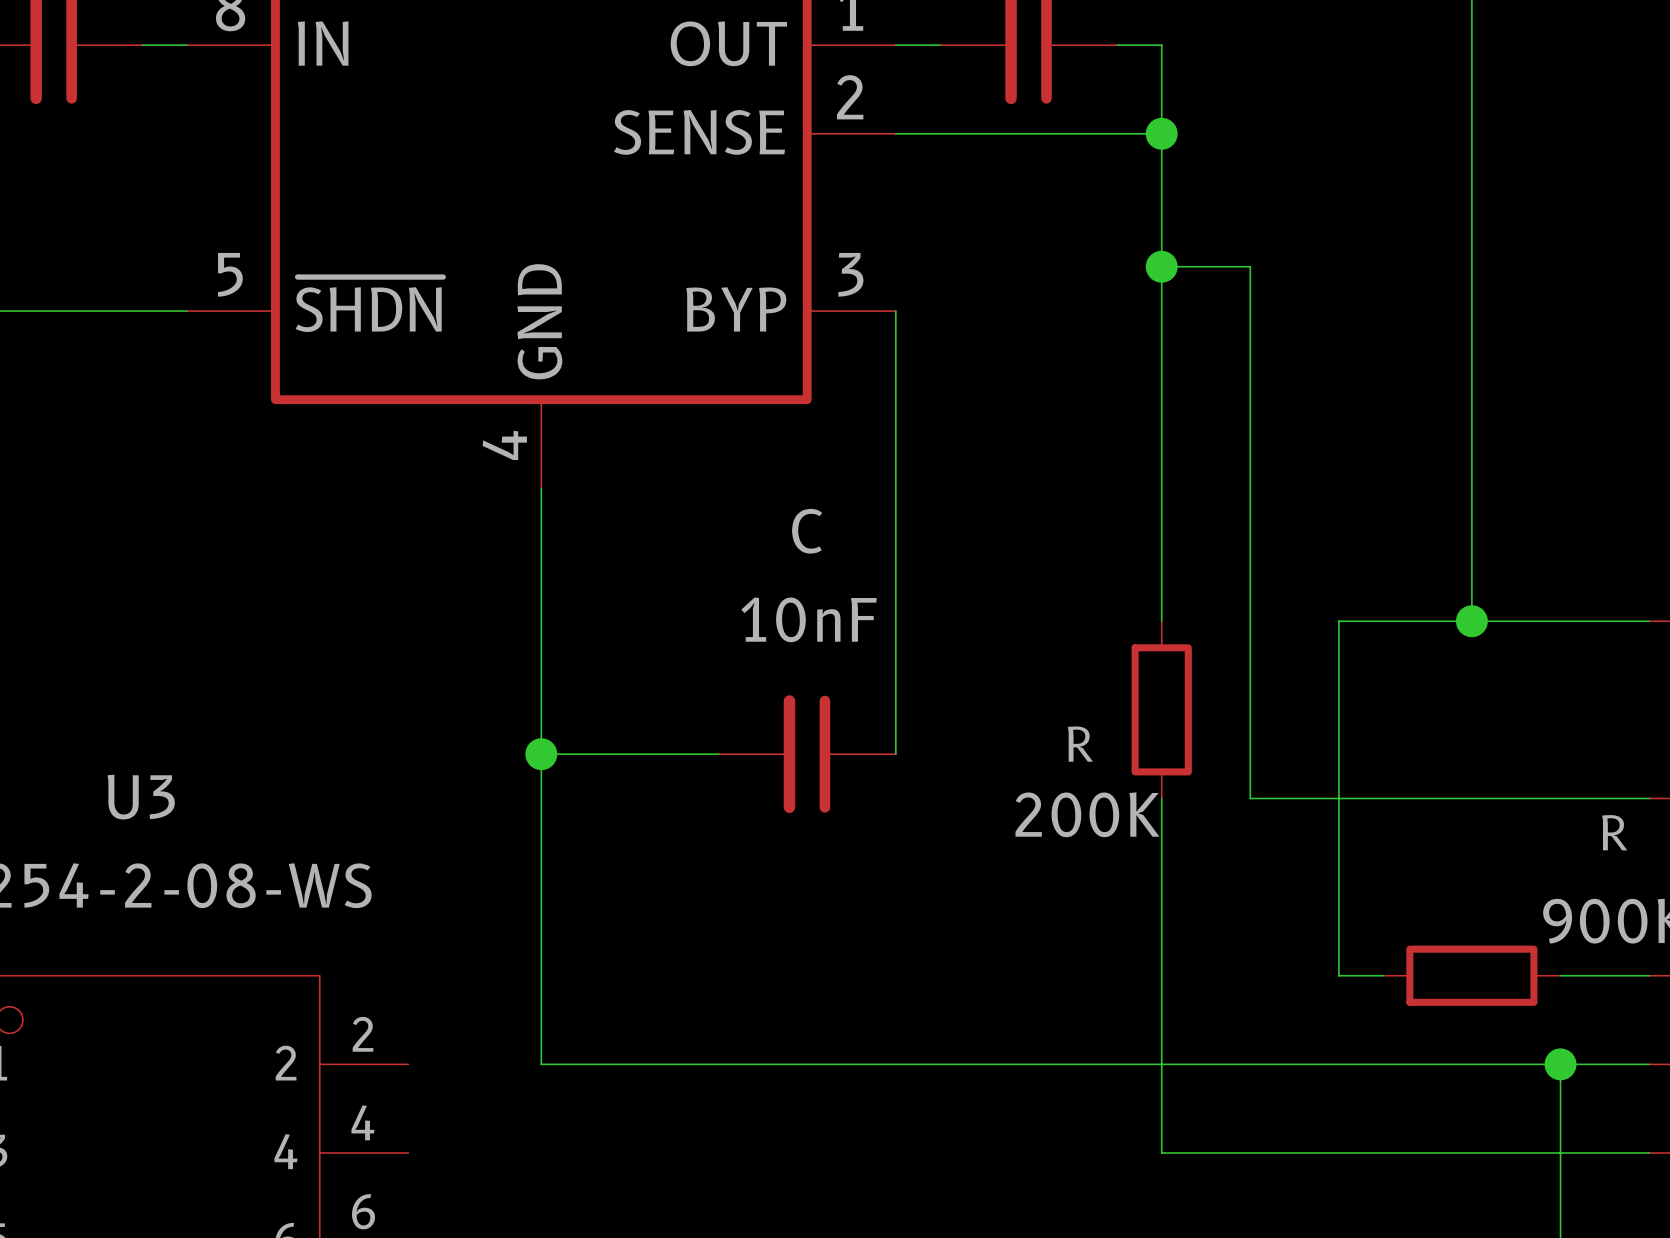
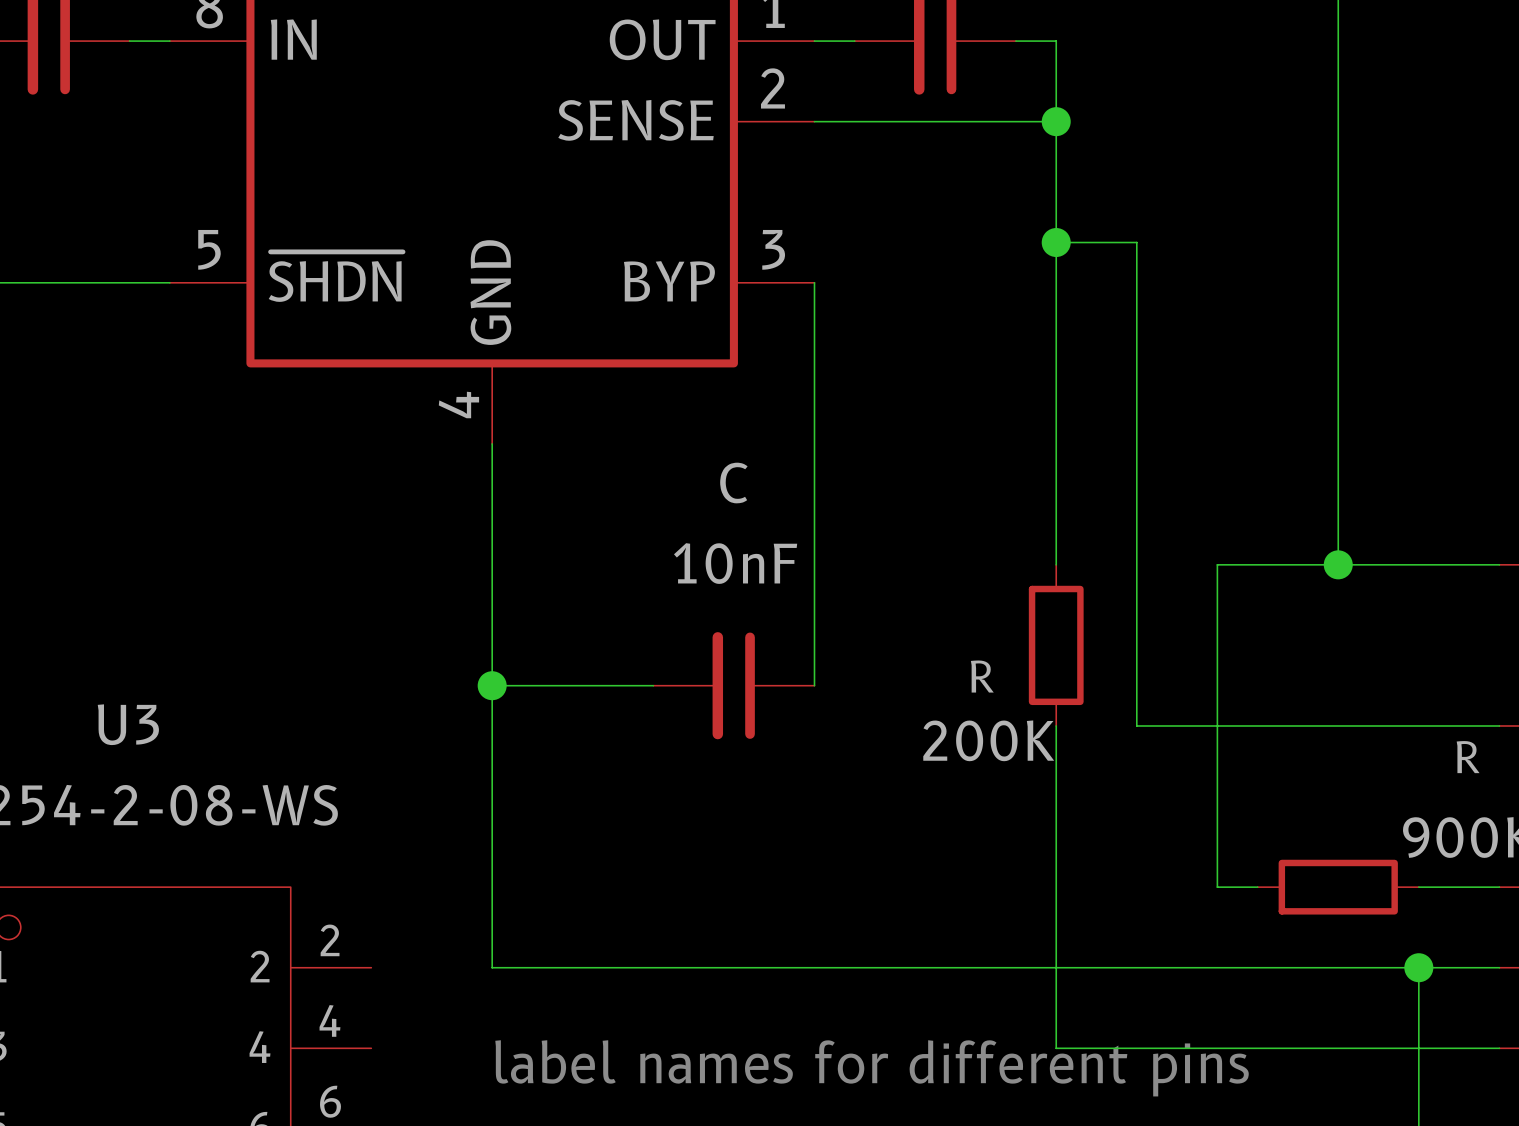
text: none -> label names for different pins (872, 1068)

